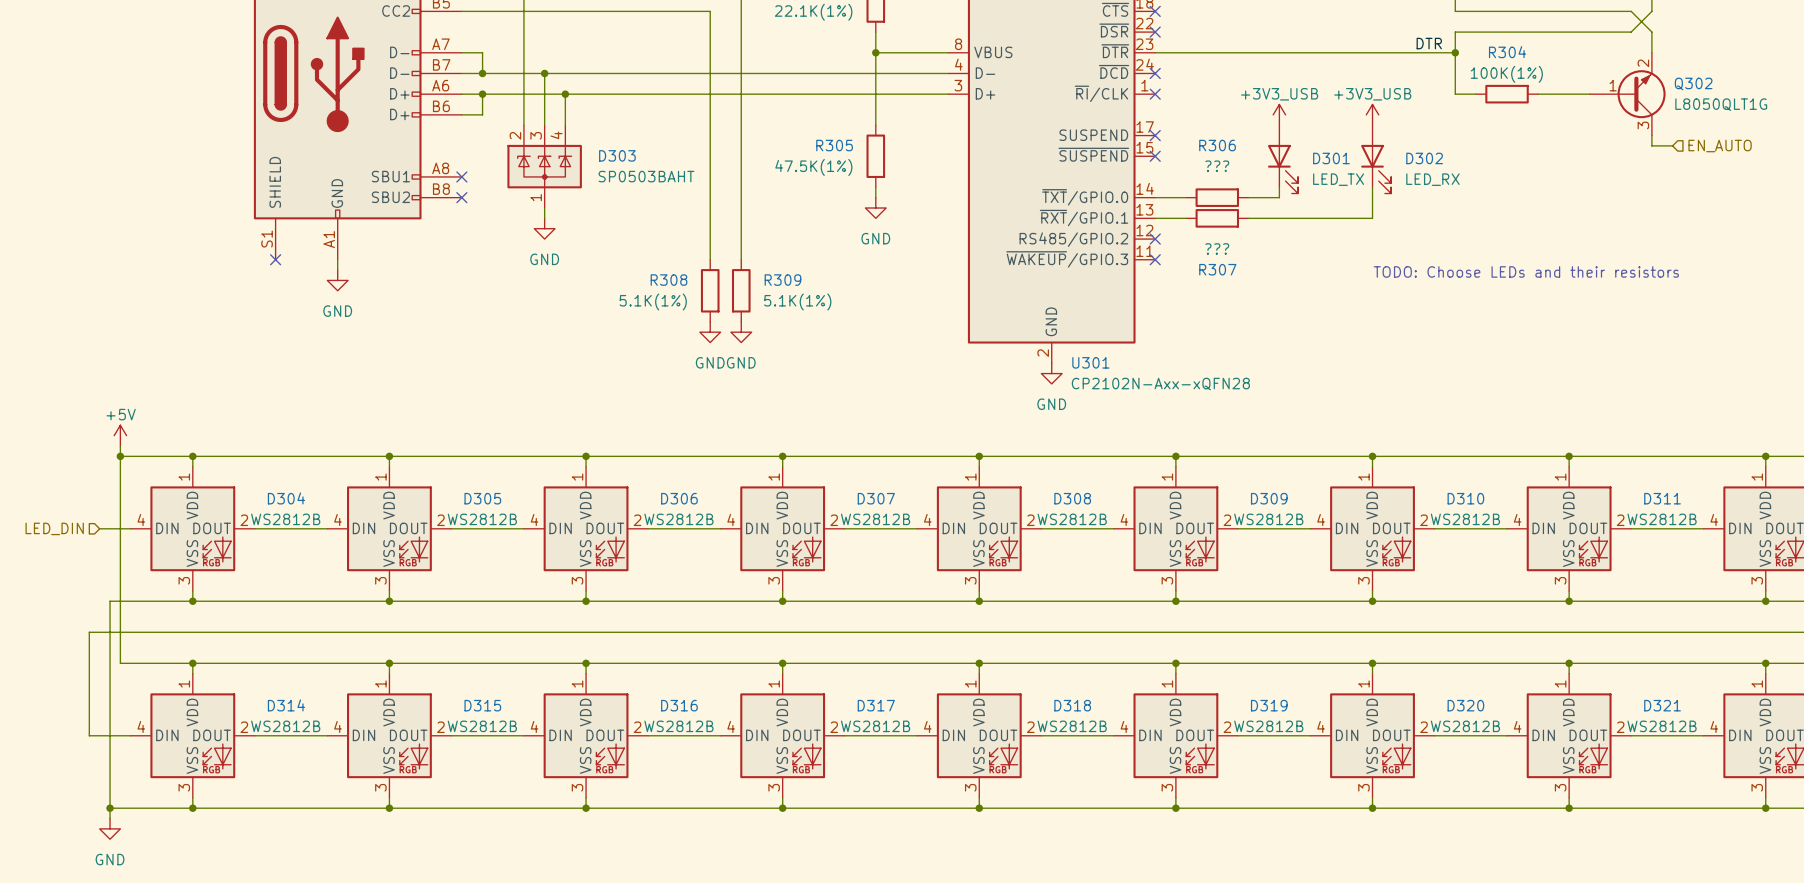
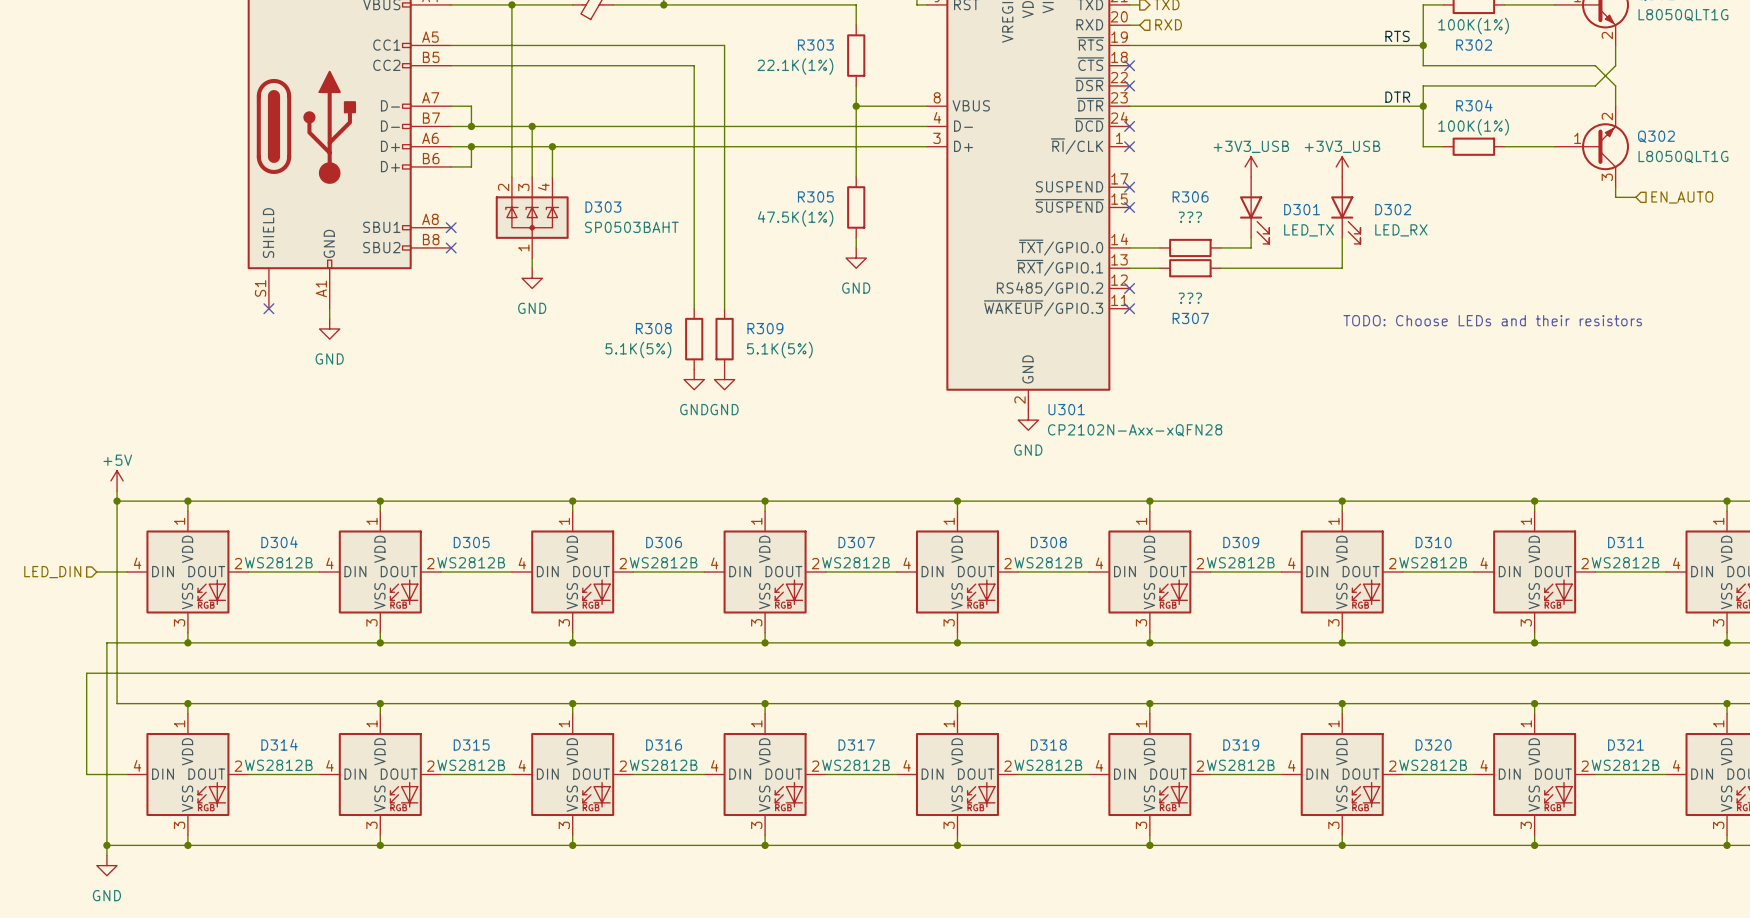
R308 value: 5.1K(1%) (653, 301) -> 5.1K(5%) (638, 350)
R309 value: 5.1K(1%) (797, 301) -> 5.1K(5%) (779, 350)

